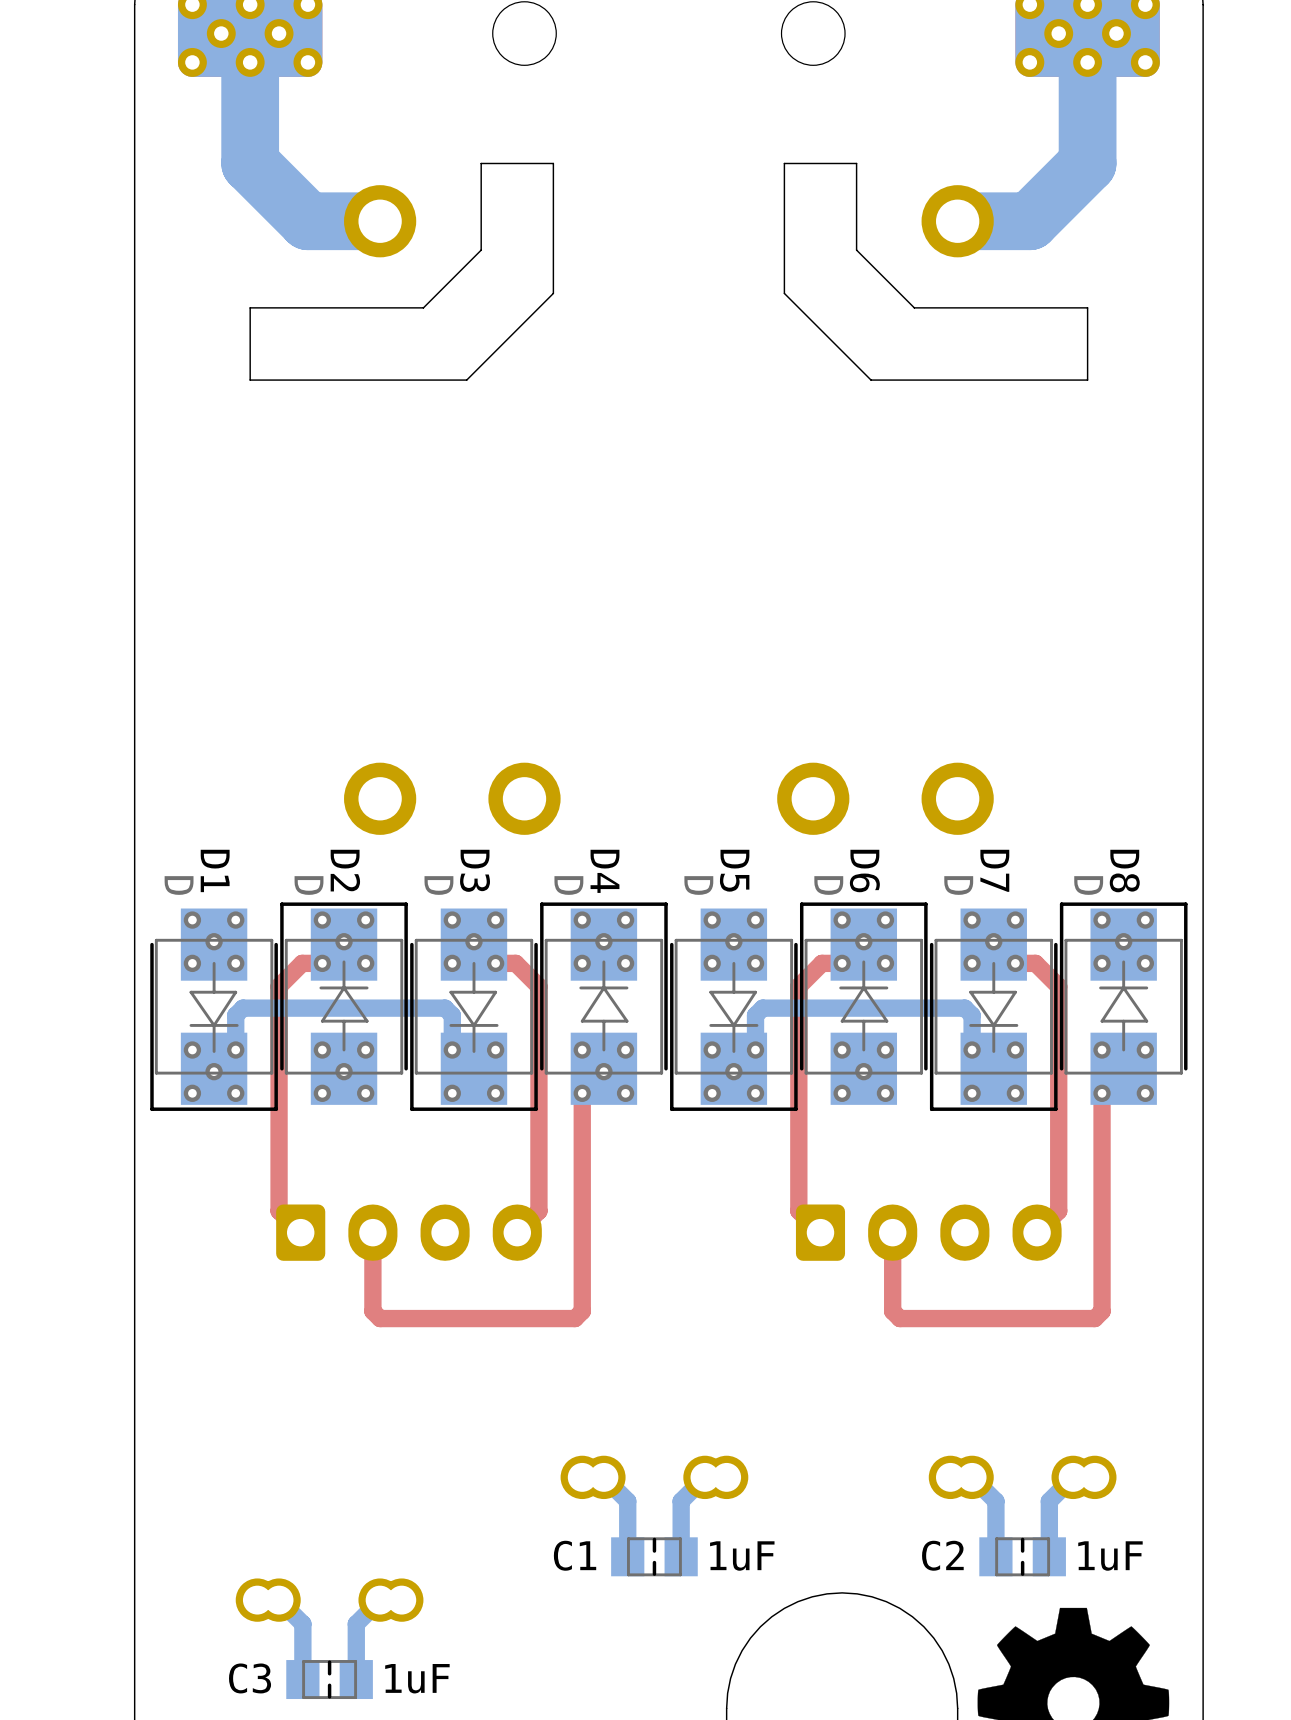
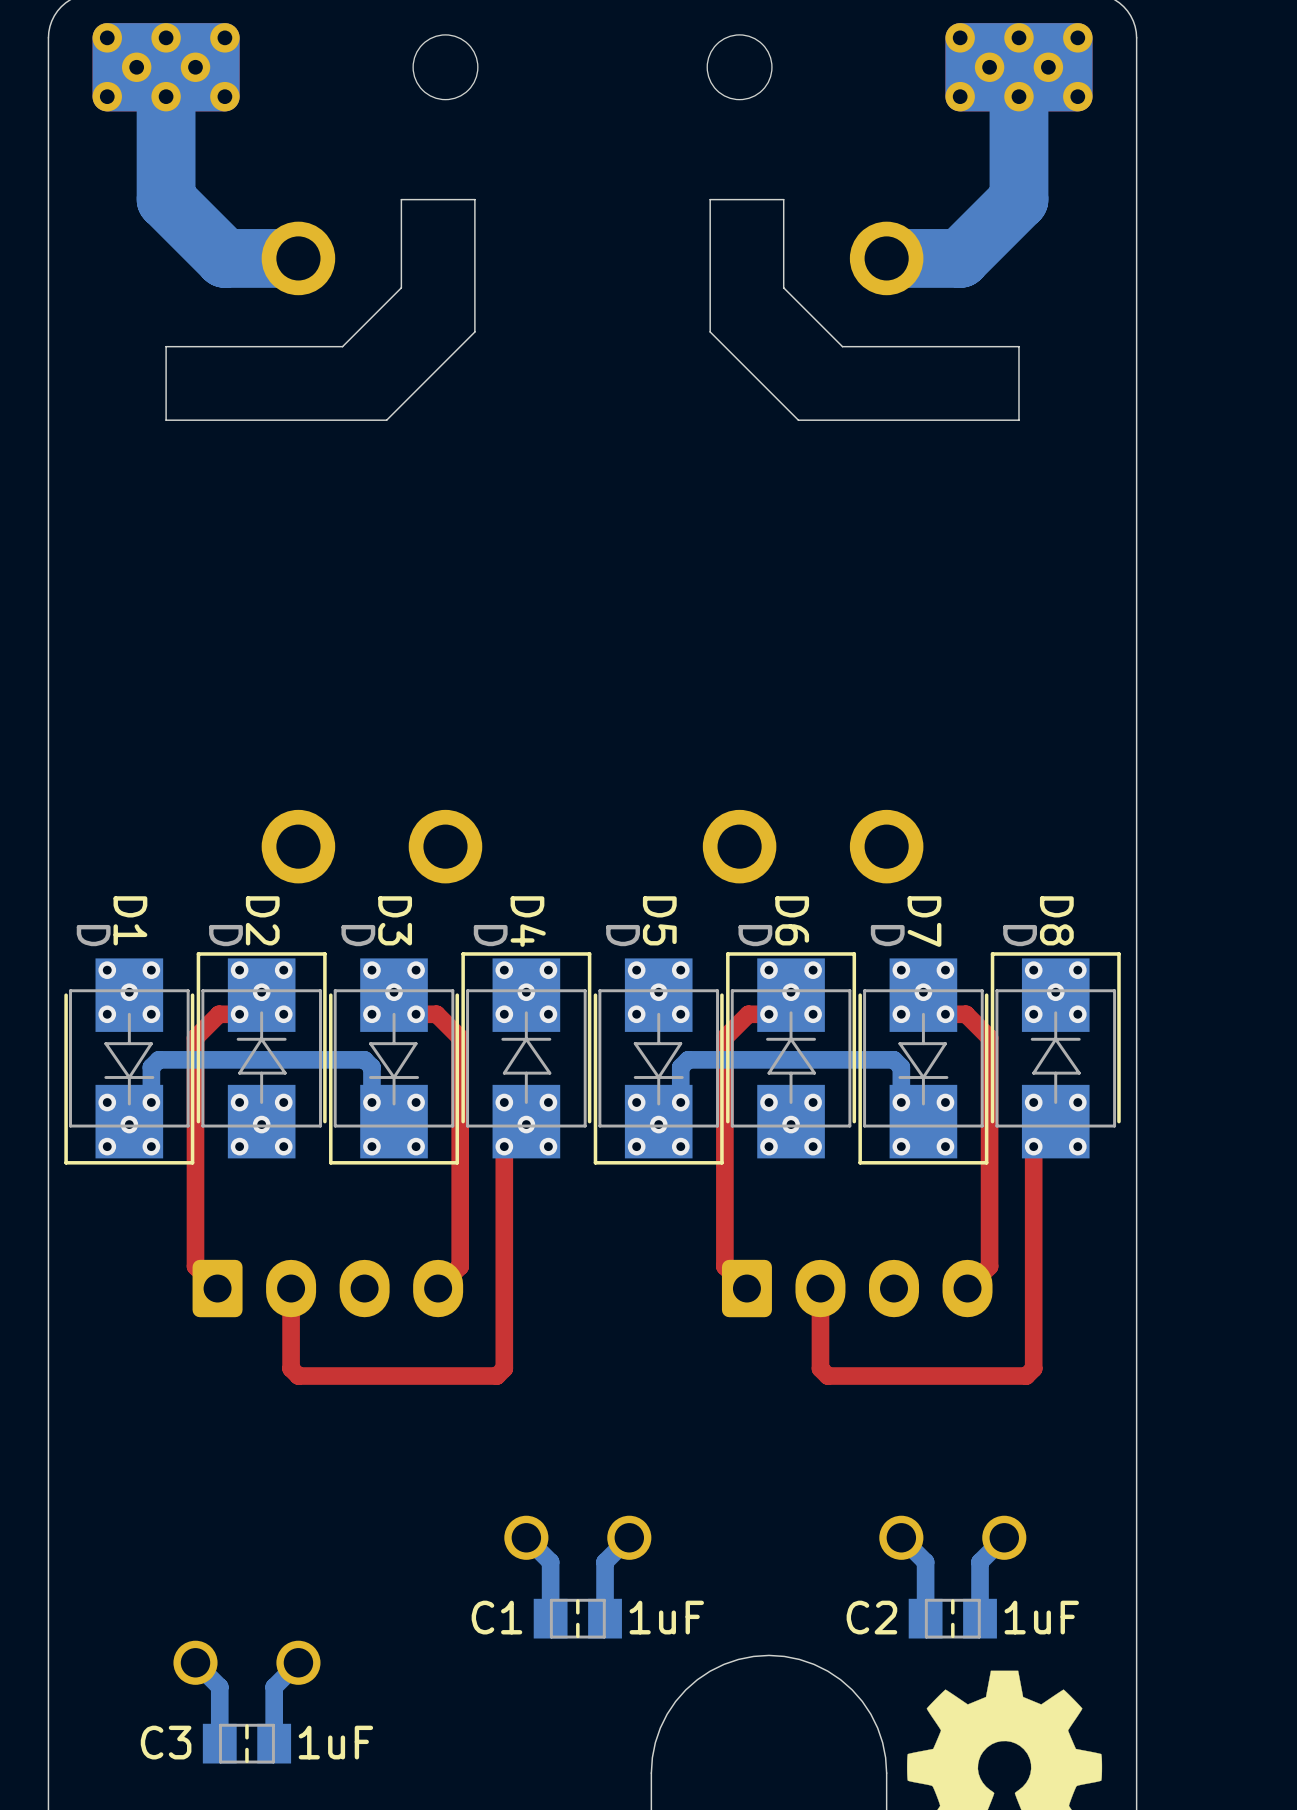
part footprint: [560, 1455, 749, 1500] -> [504, 1515, 652, 1560]
part footprint: [928, 1455, 1117, 1500] -> [879, 1515, 1027, 1560]
part footprint: [235, 1578, 424, 1622] -> [173, 1640, 321, 1685]

